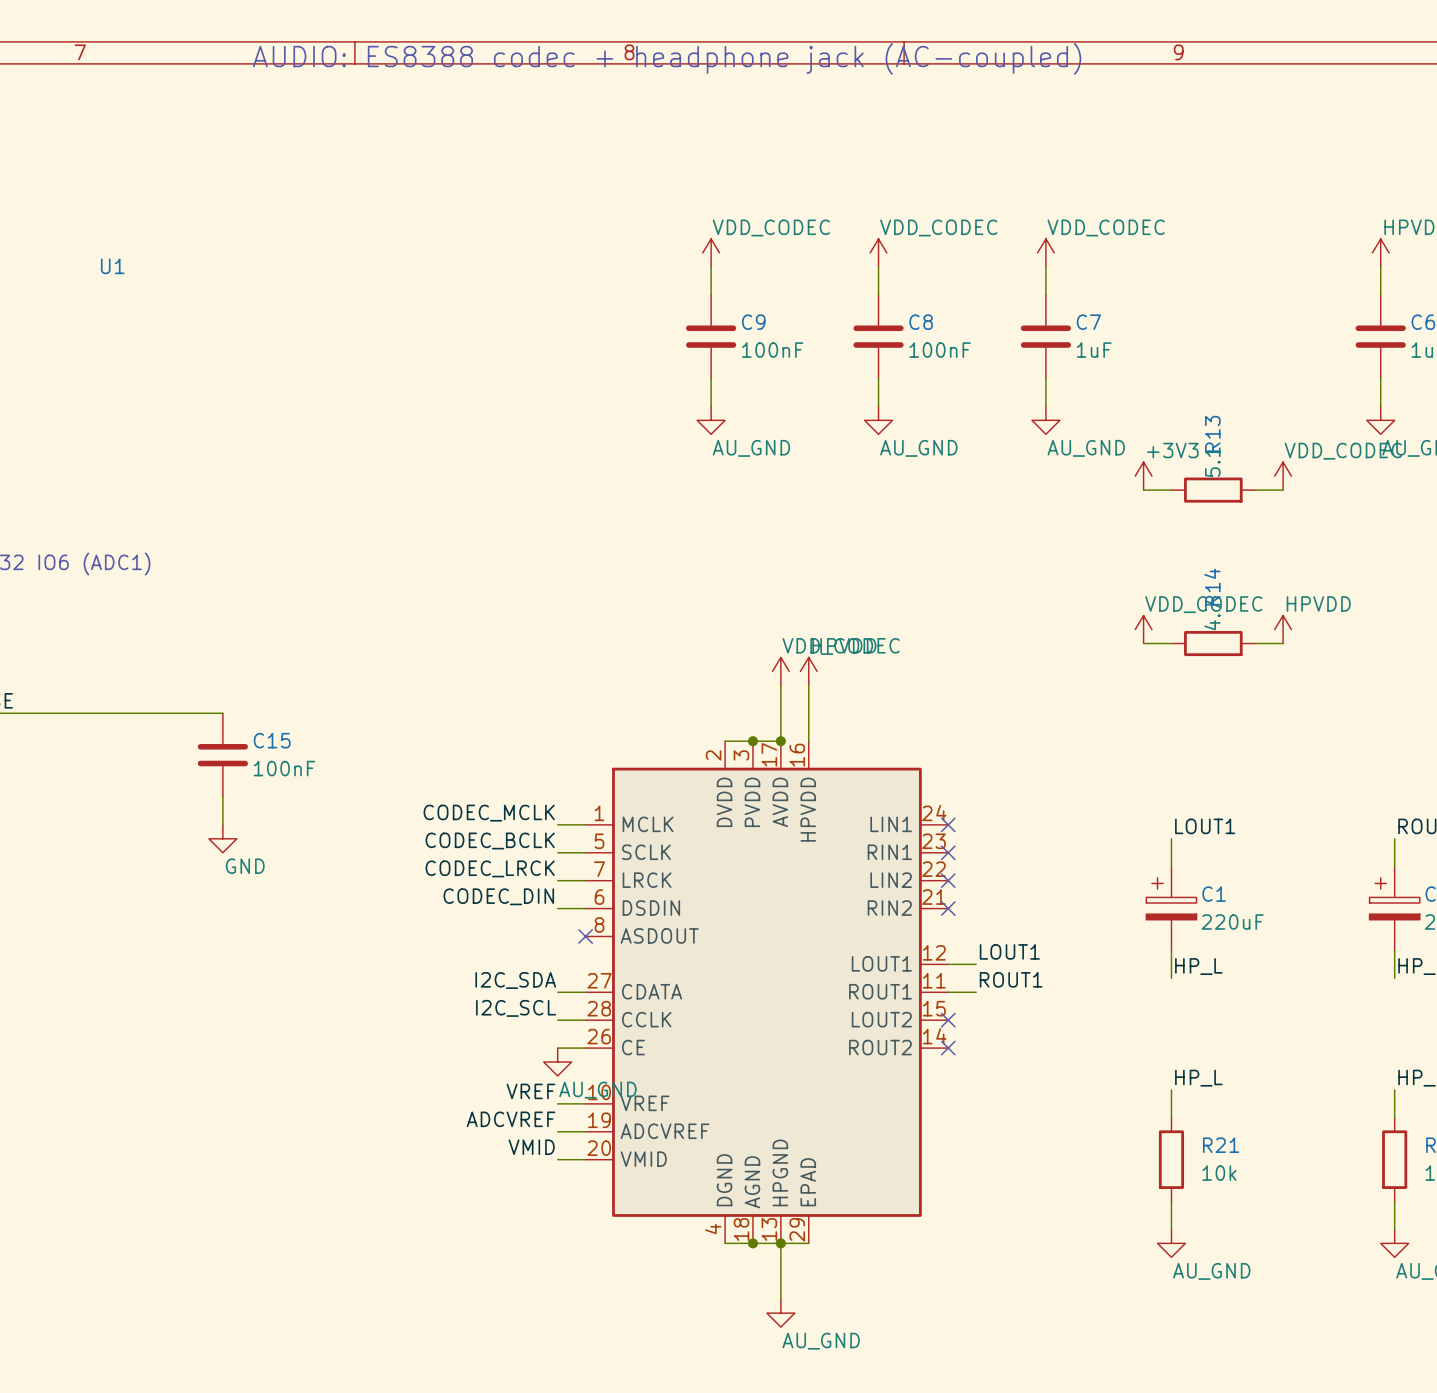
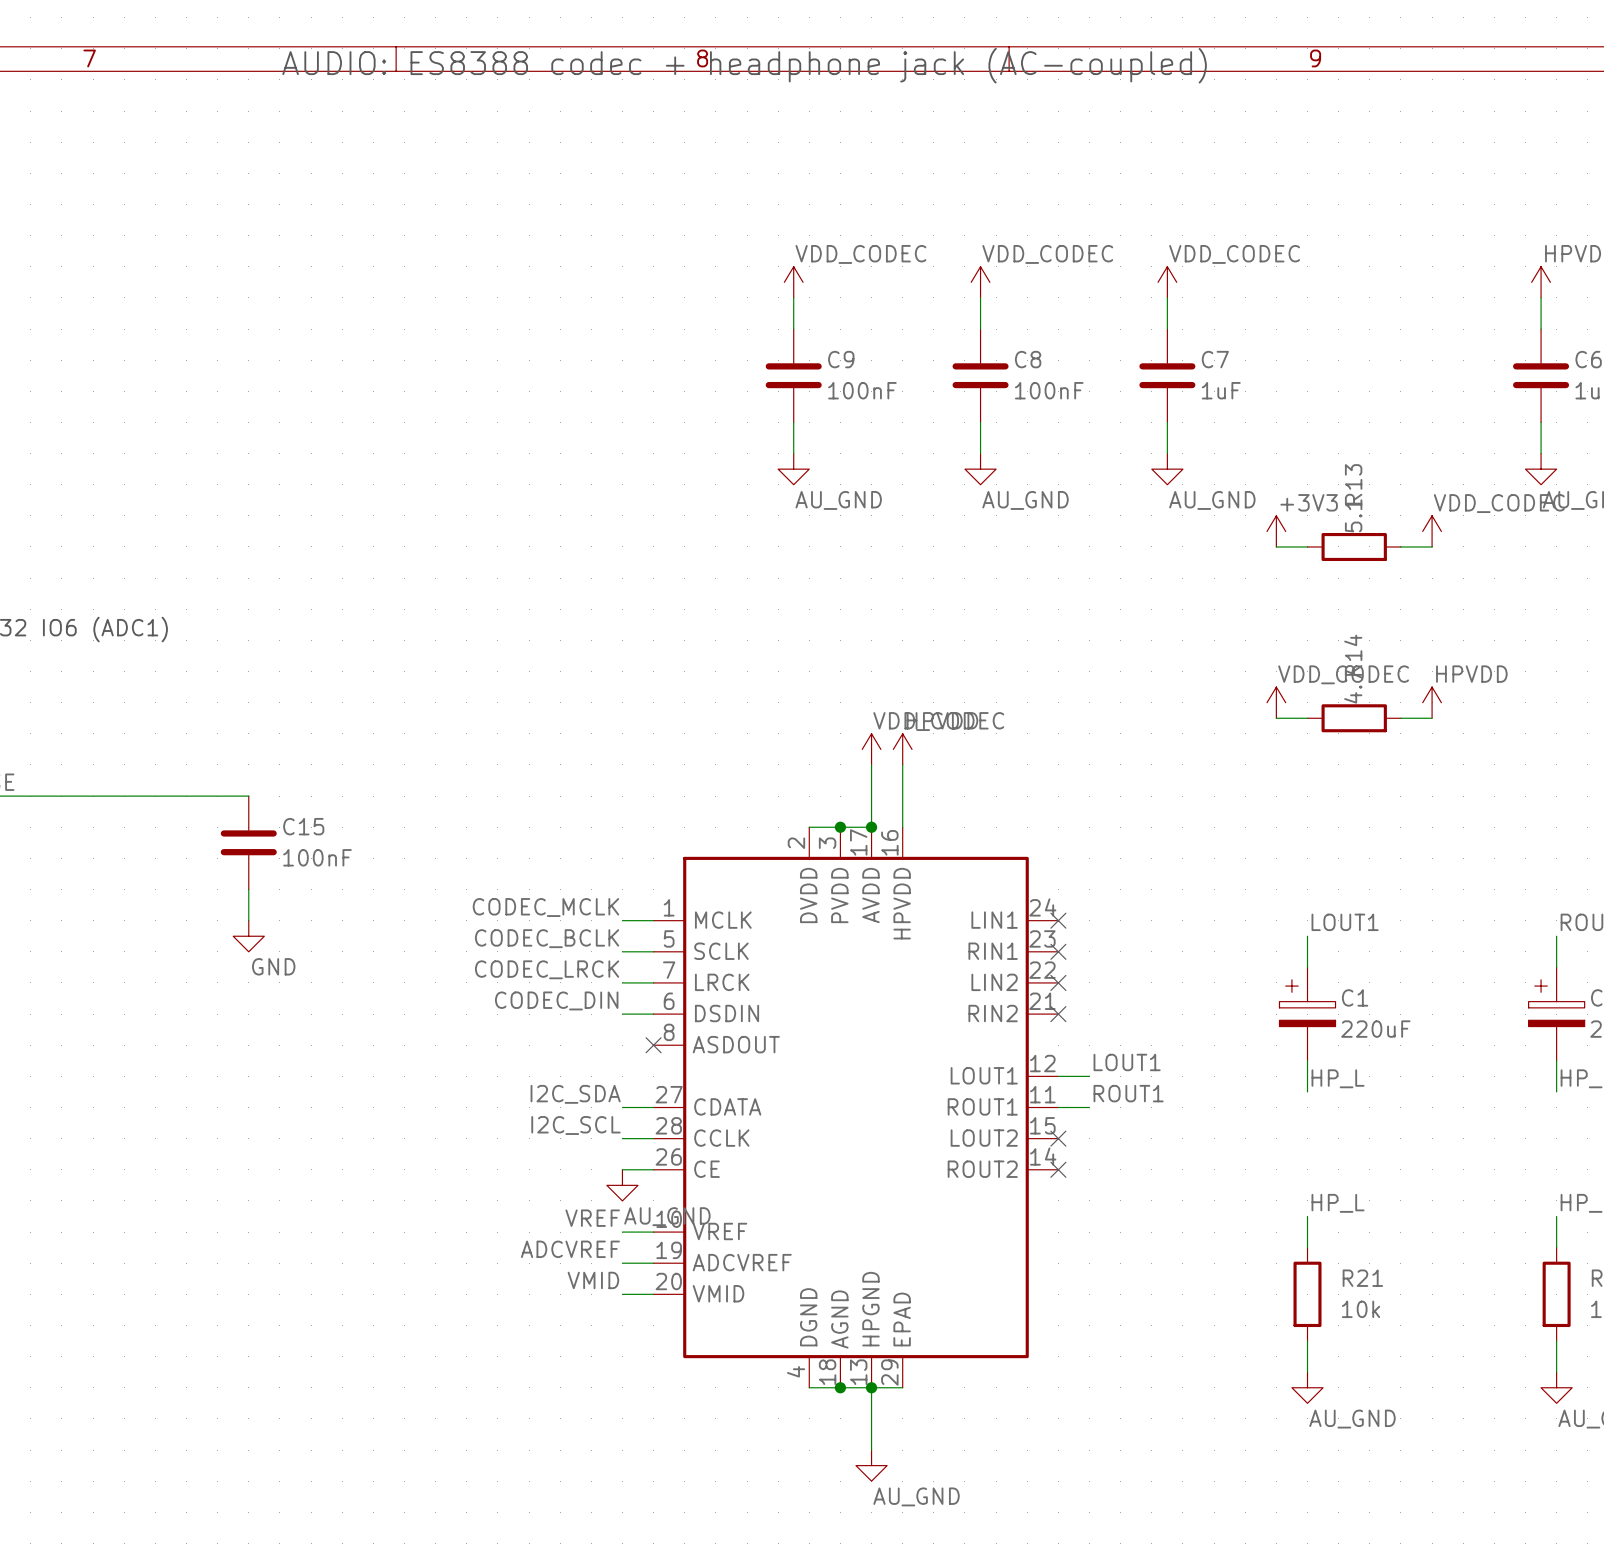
U1 name: U1 (112, 266) -> none

